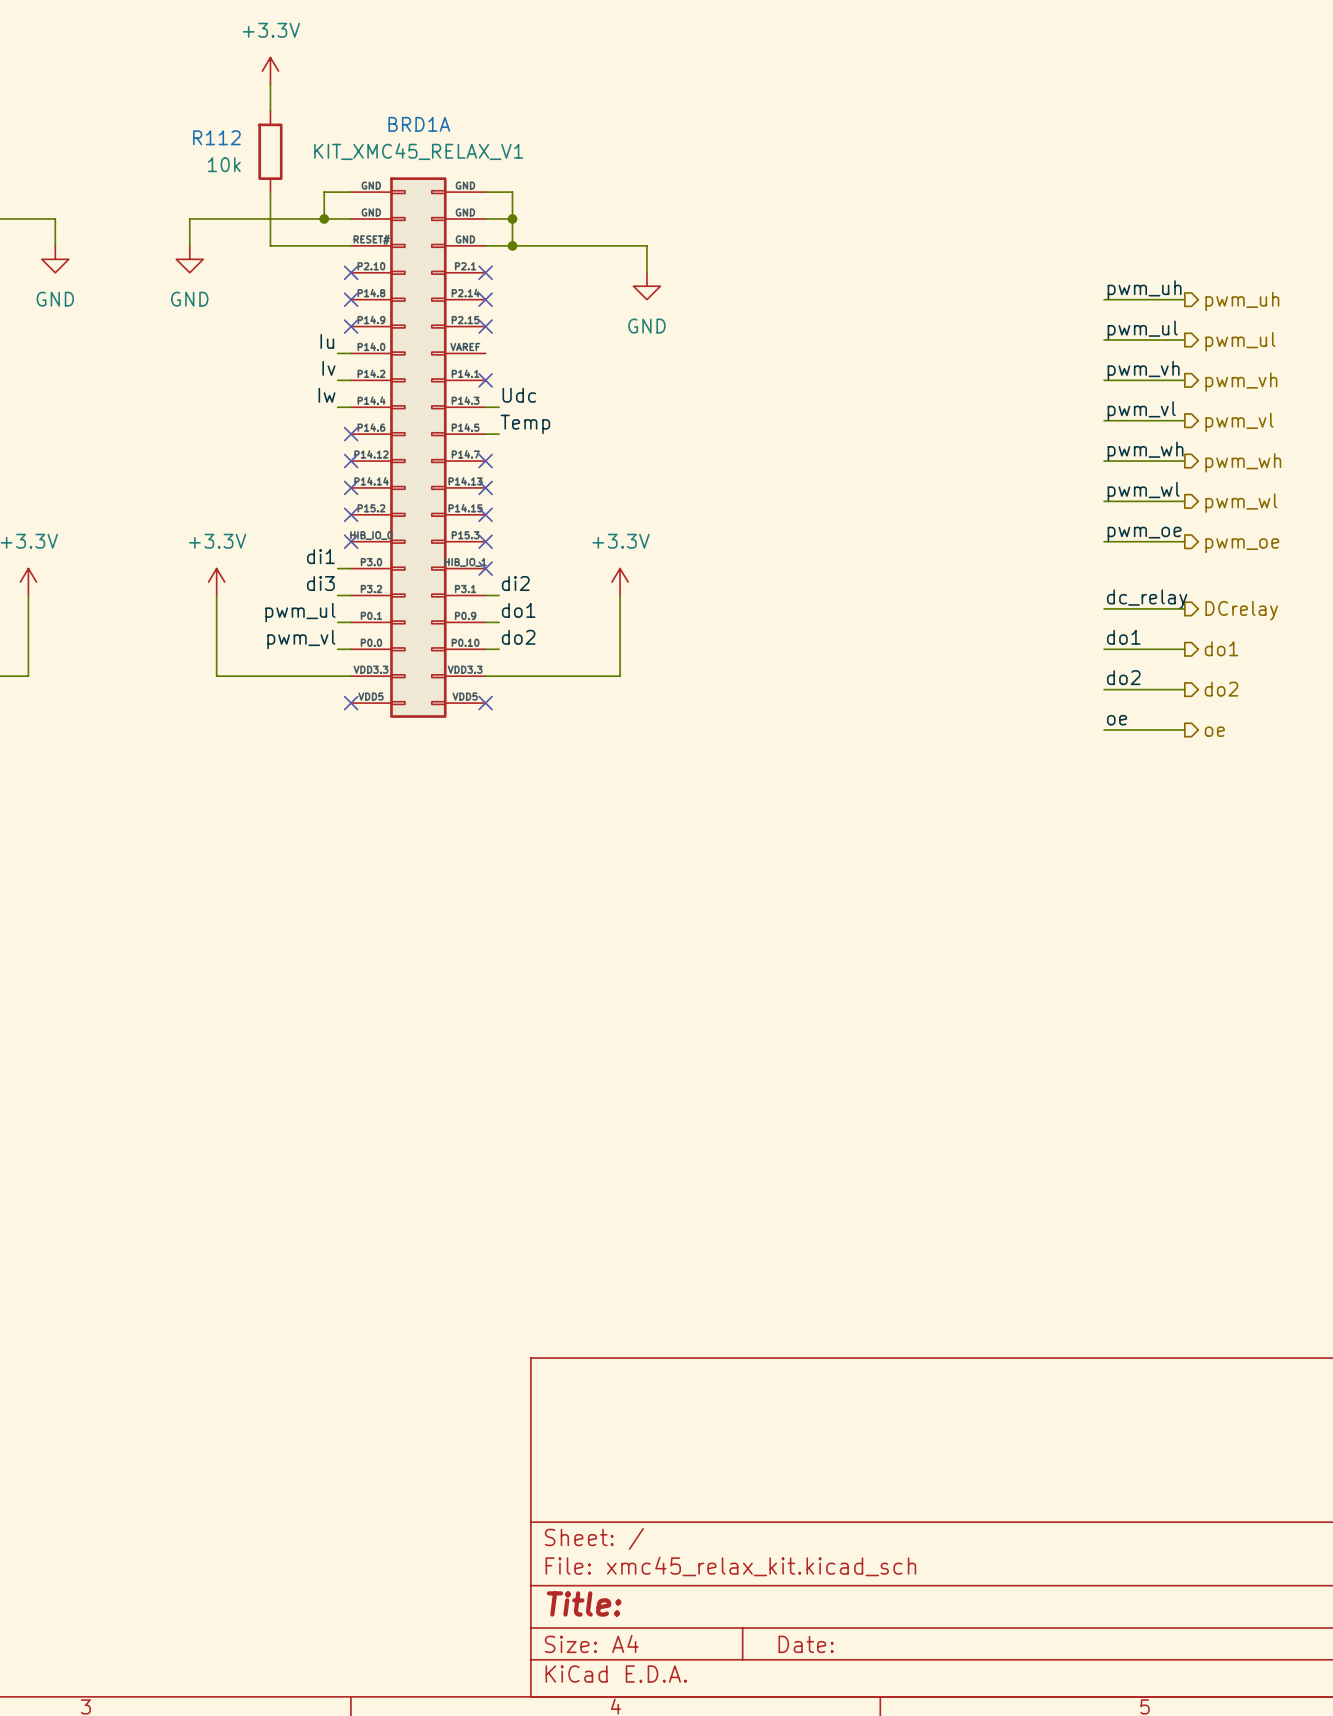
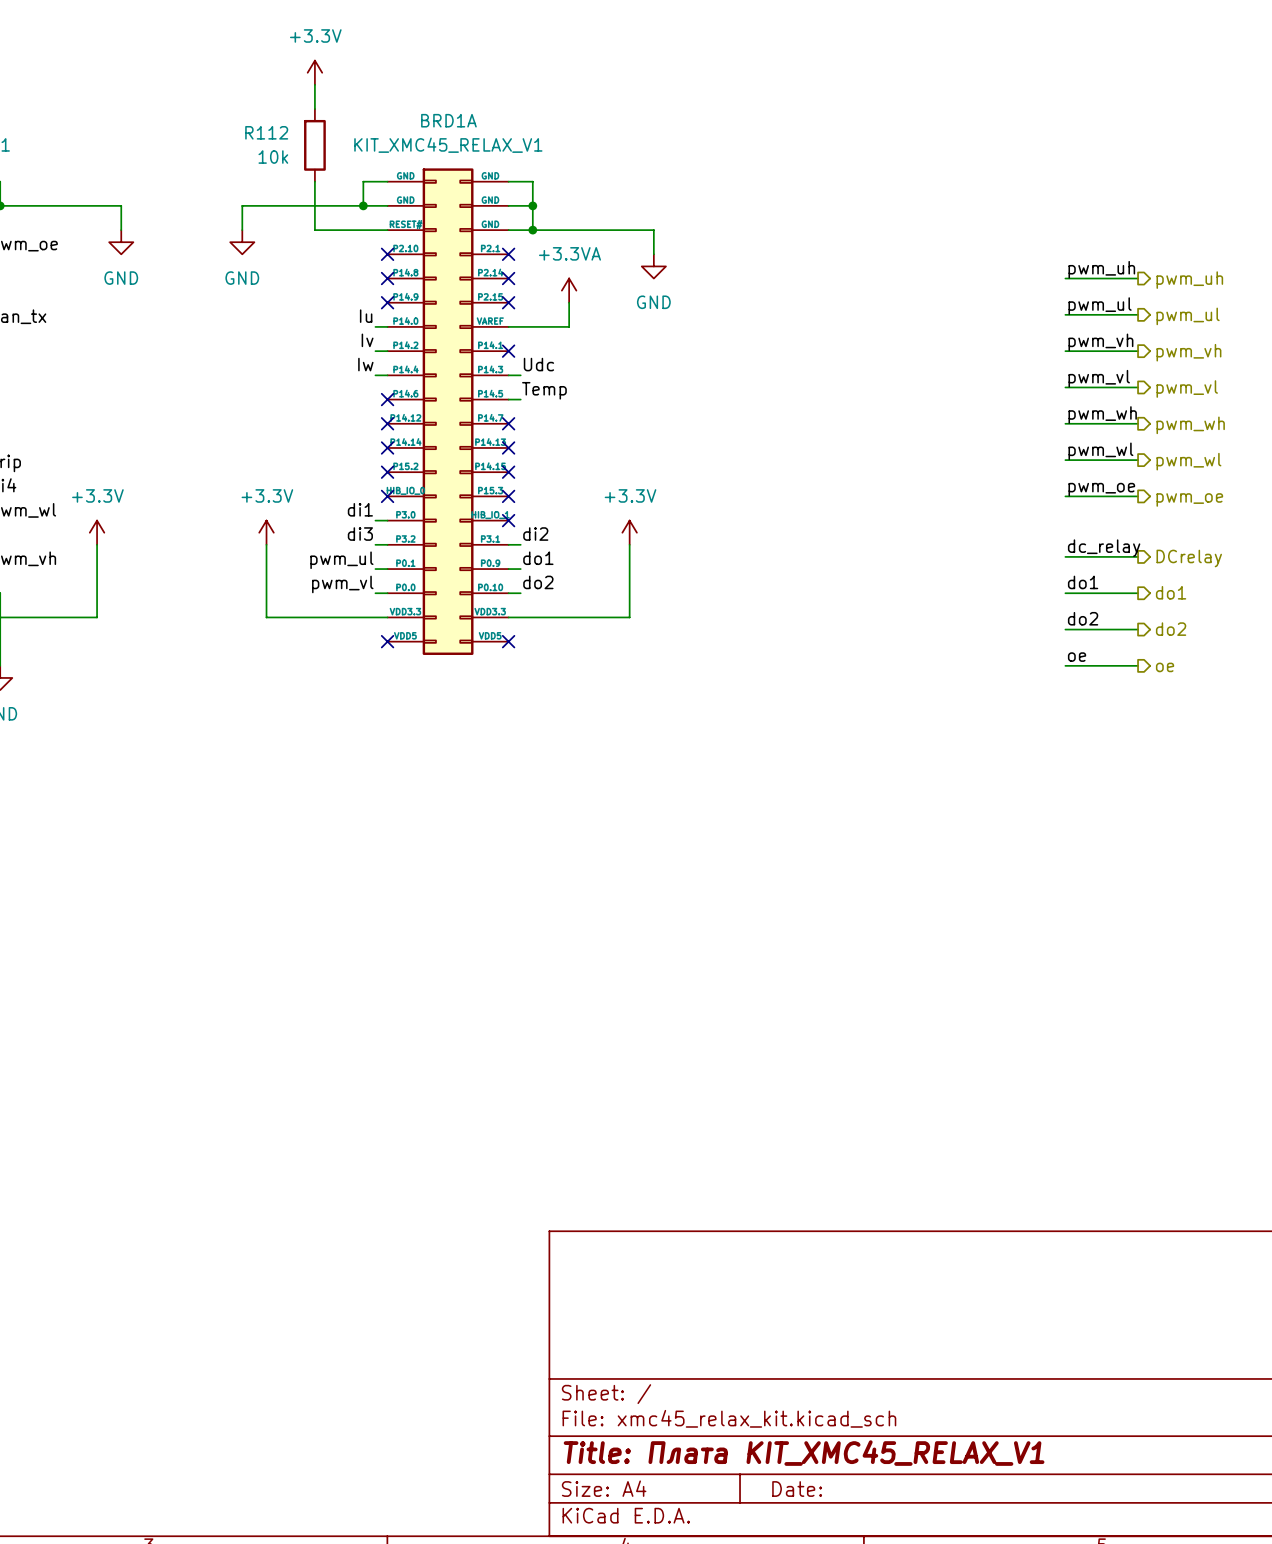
power symbol: none -> +3.3VA (569, 290)
wire: none -> (569, 302) (569, 326) (508, 326)
title block: Title: (584, 1603) -> Title: Плата KIT_XMC45_RELAX_V1 (804, 1453)

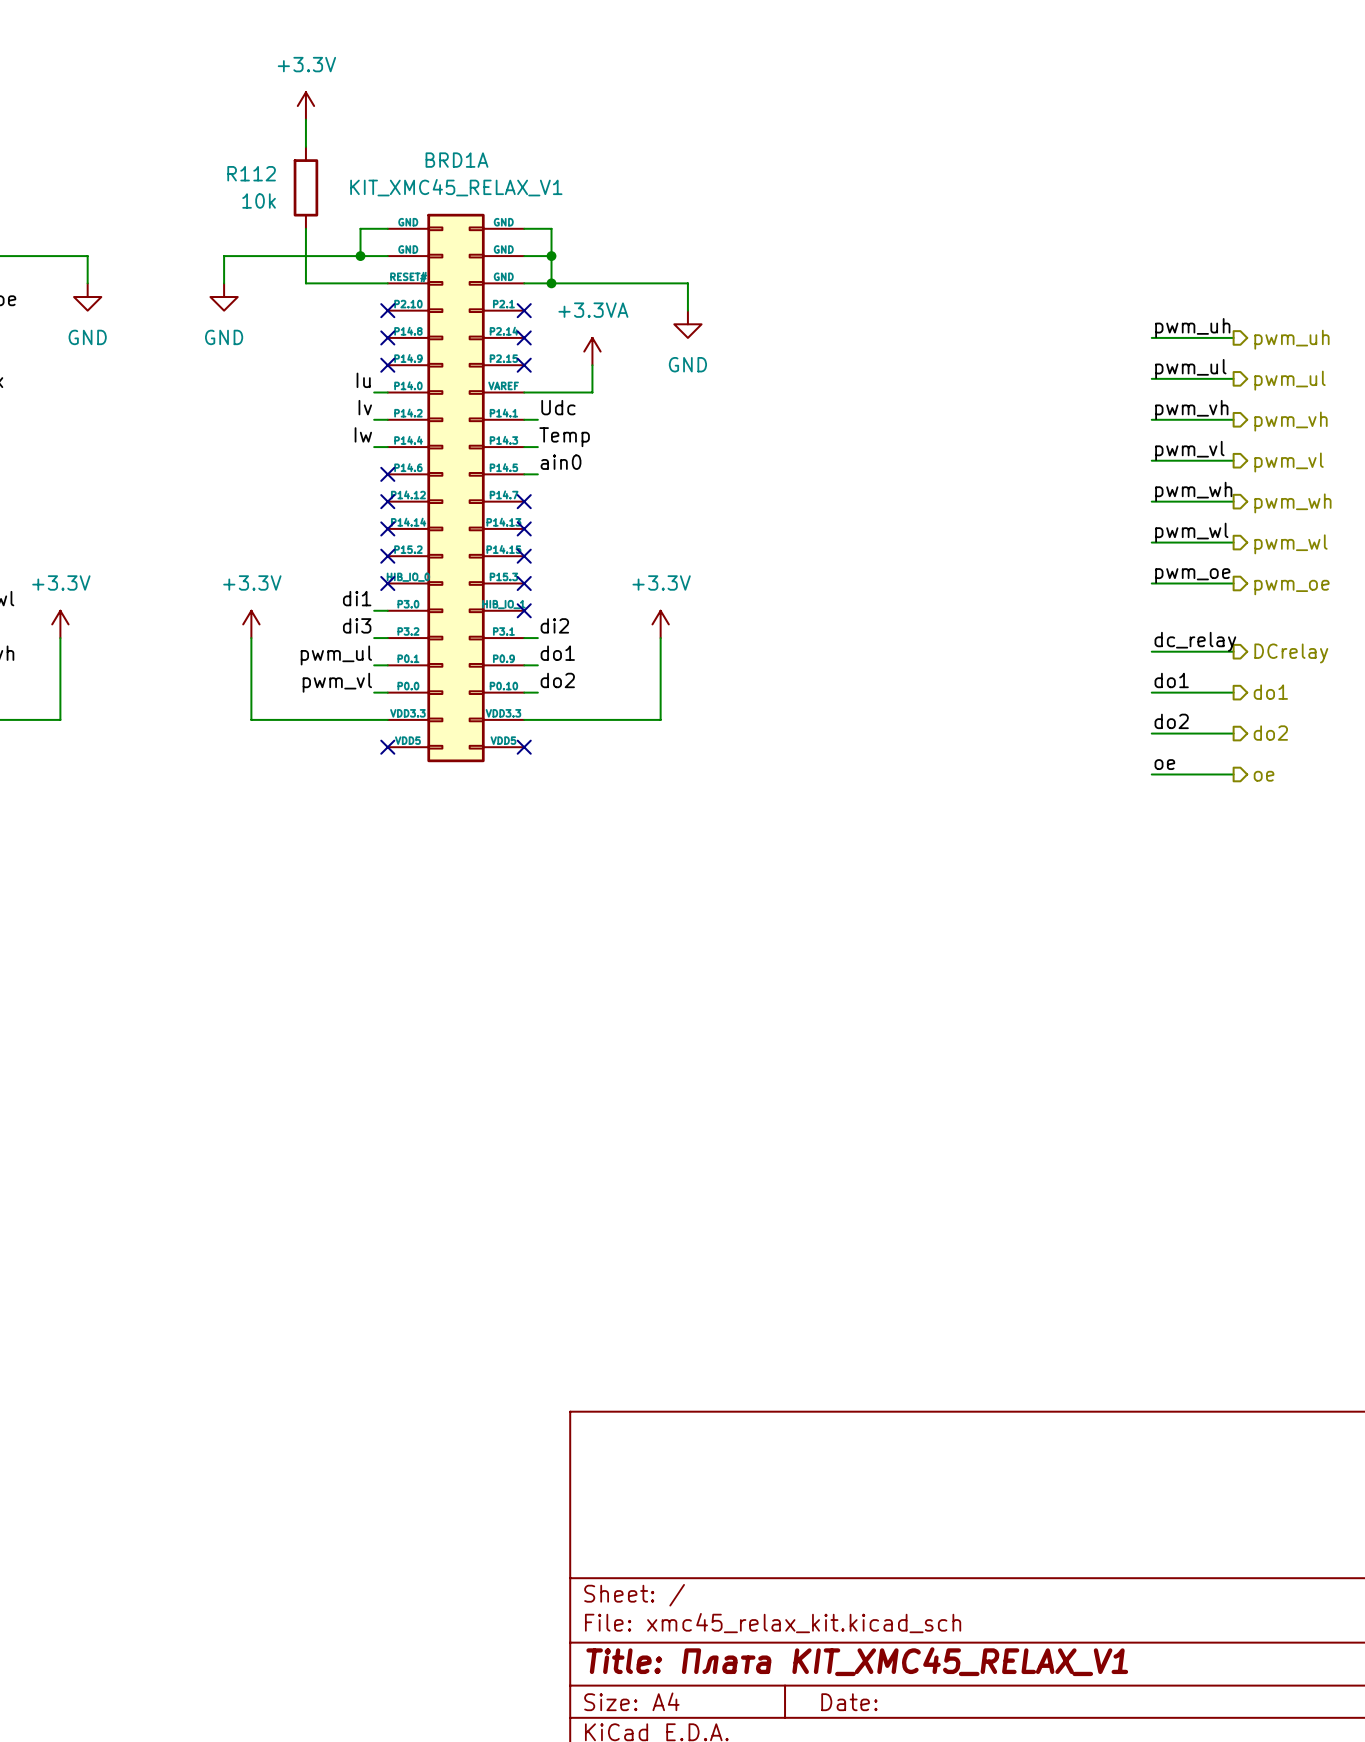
label: none -> Udc (558, 407)
wire: none -> (524, 419) (537, 419)
no-connect mark: (508, 351) -> none
label: Udc (538, 364) -> Temp (564, 437)
label: Temp (544, 390) -> ain0 (561, 462)

